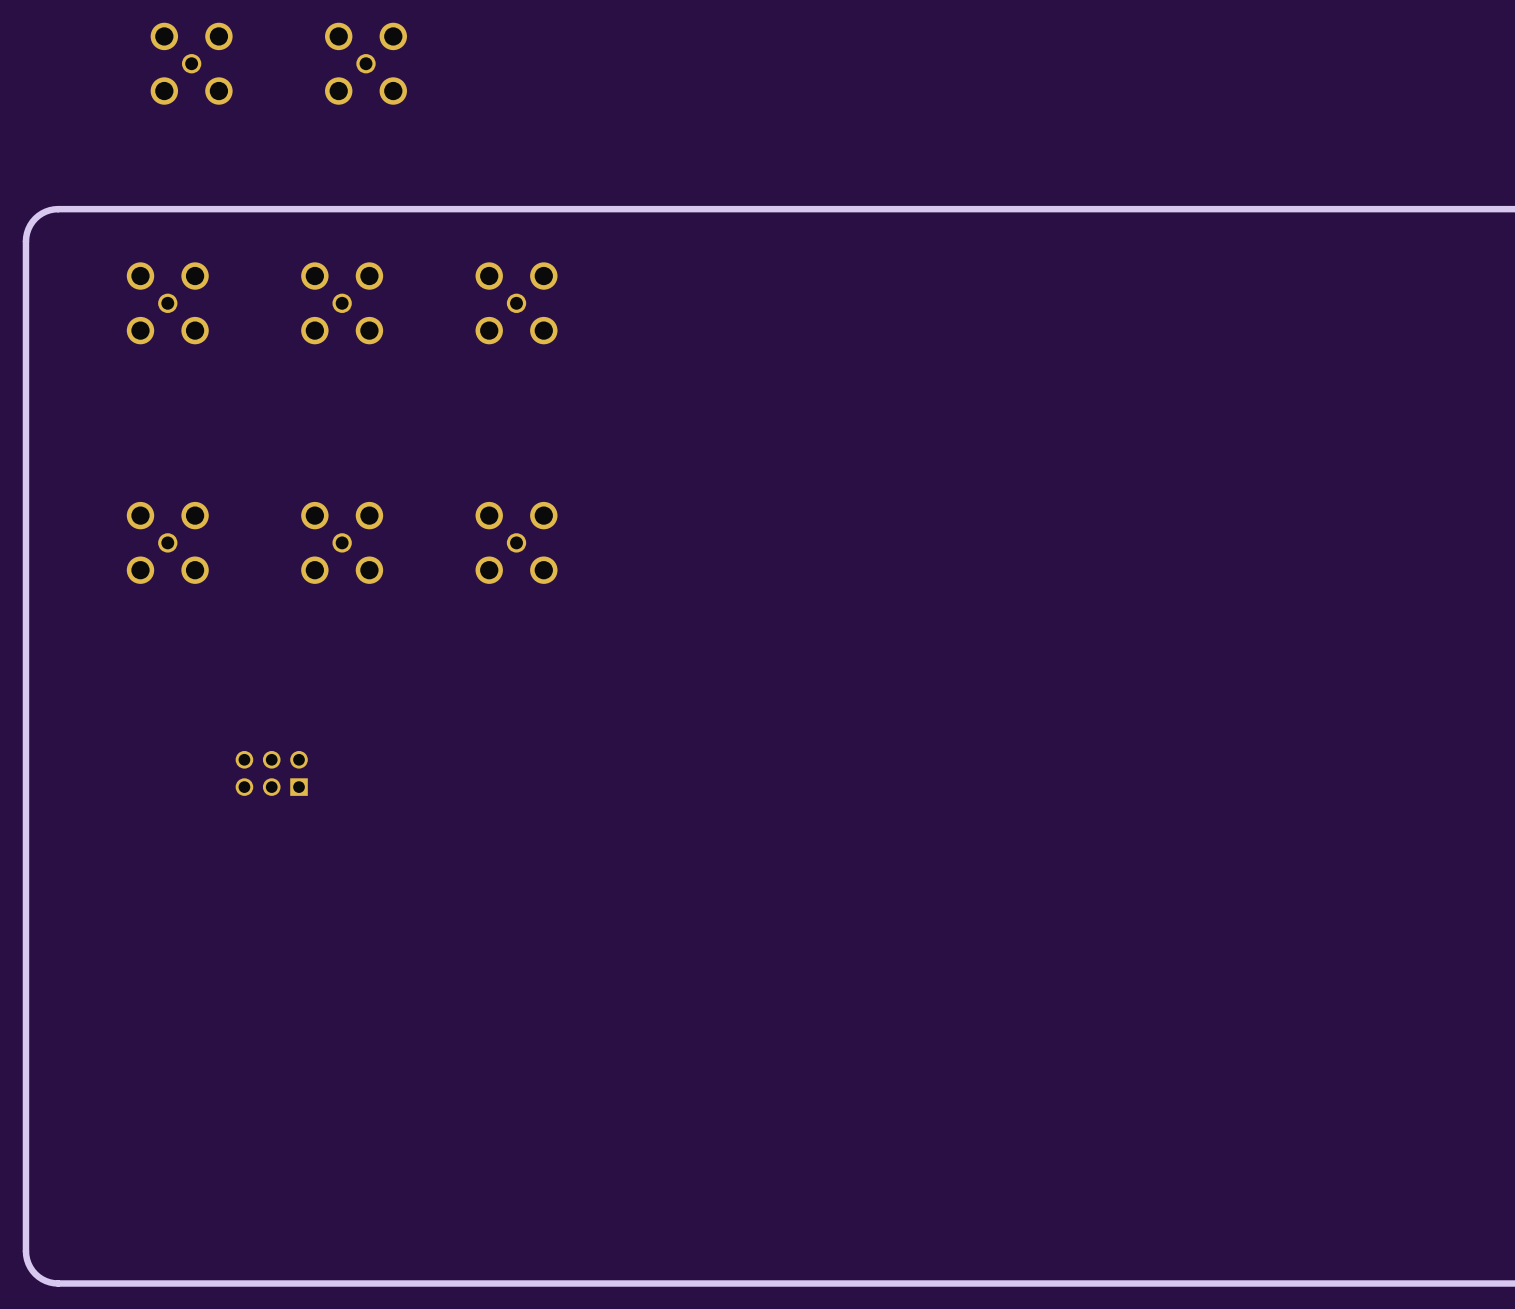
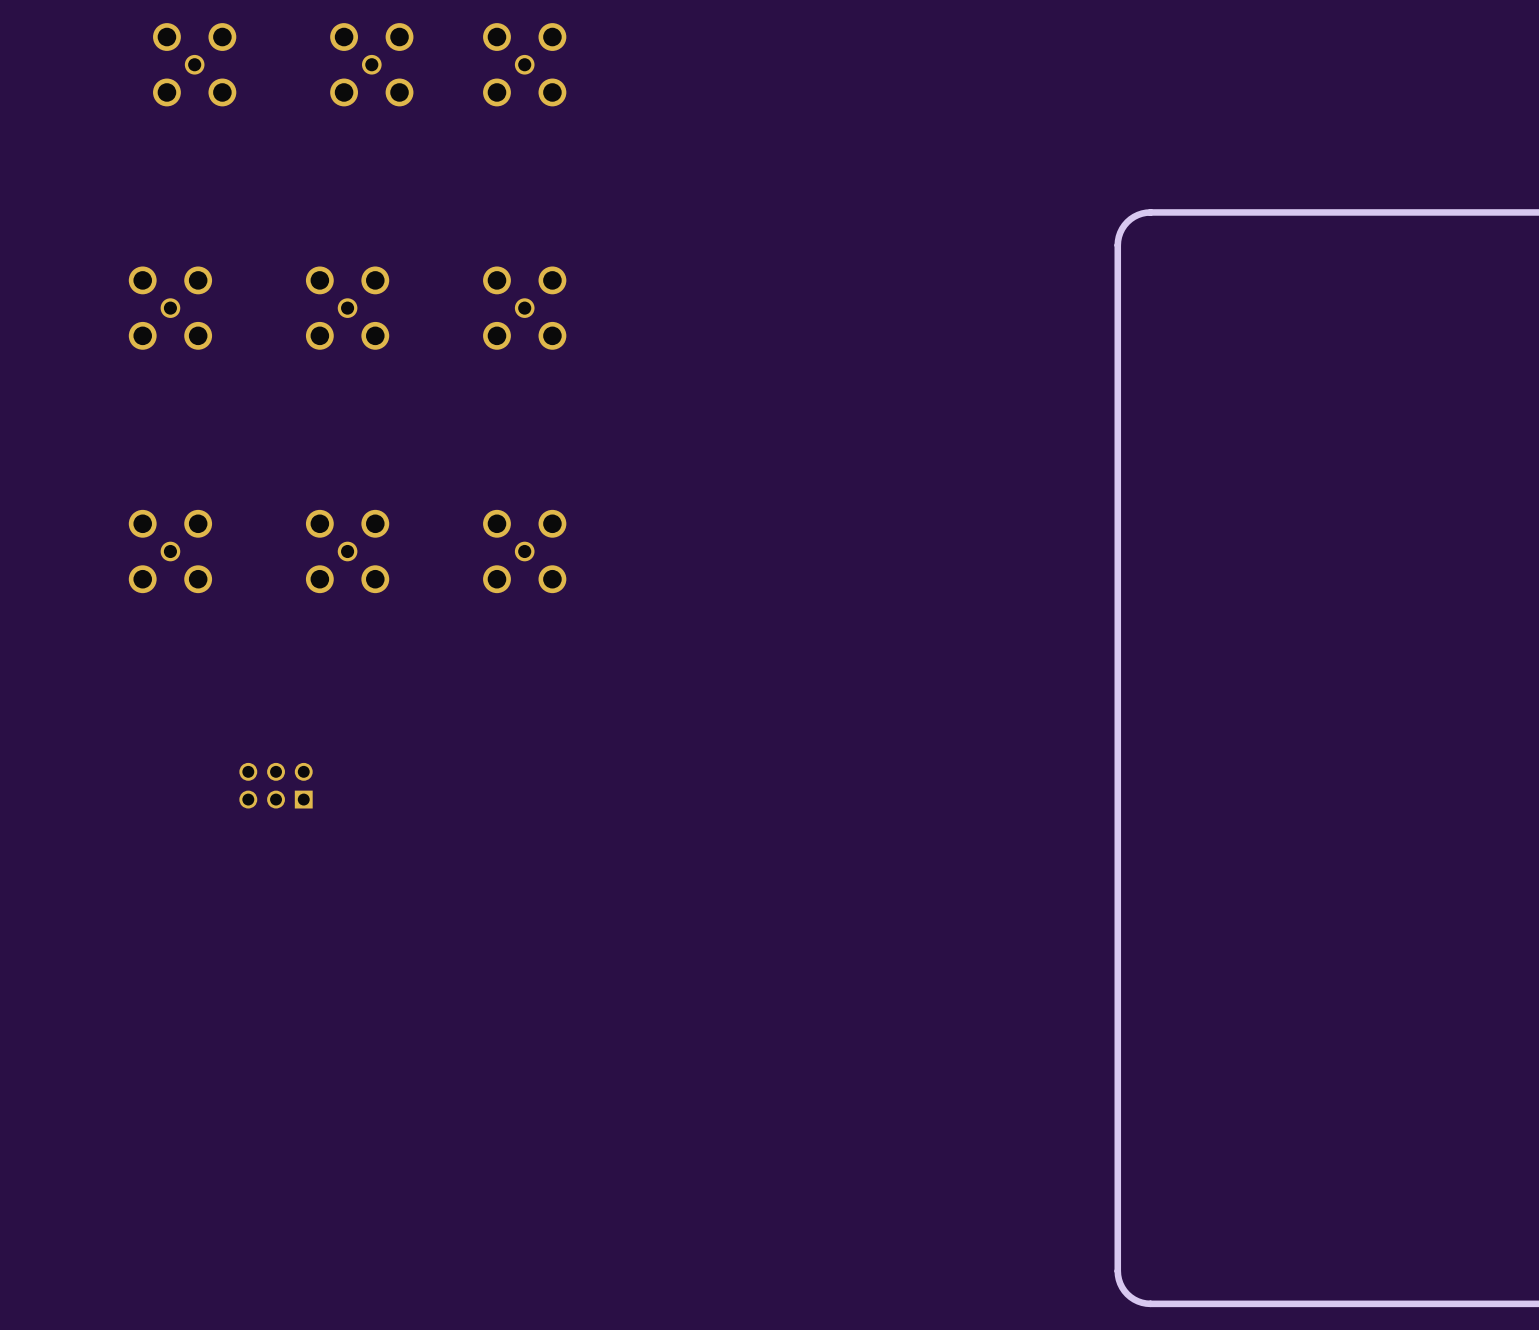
part: none -> (524, 64)
board edge: (1132, 209) (58, 209) (45, 211) (35, 218) (28, 229) (25, 241) (25, 1251) (28, 1263) (35, 1274) (45, 1281) (58, 1283) (1132, 1283) -> (1150, 212) (1137, 214) (1127, 222) (1120, 232) (1117, 245) (1117, 1271) (1120, 1283) (1127, 1294) (1137, 1301) (1150, 1303)

